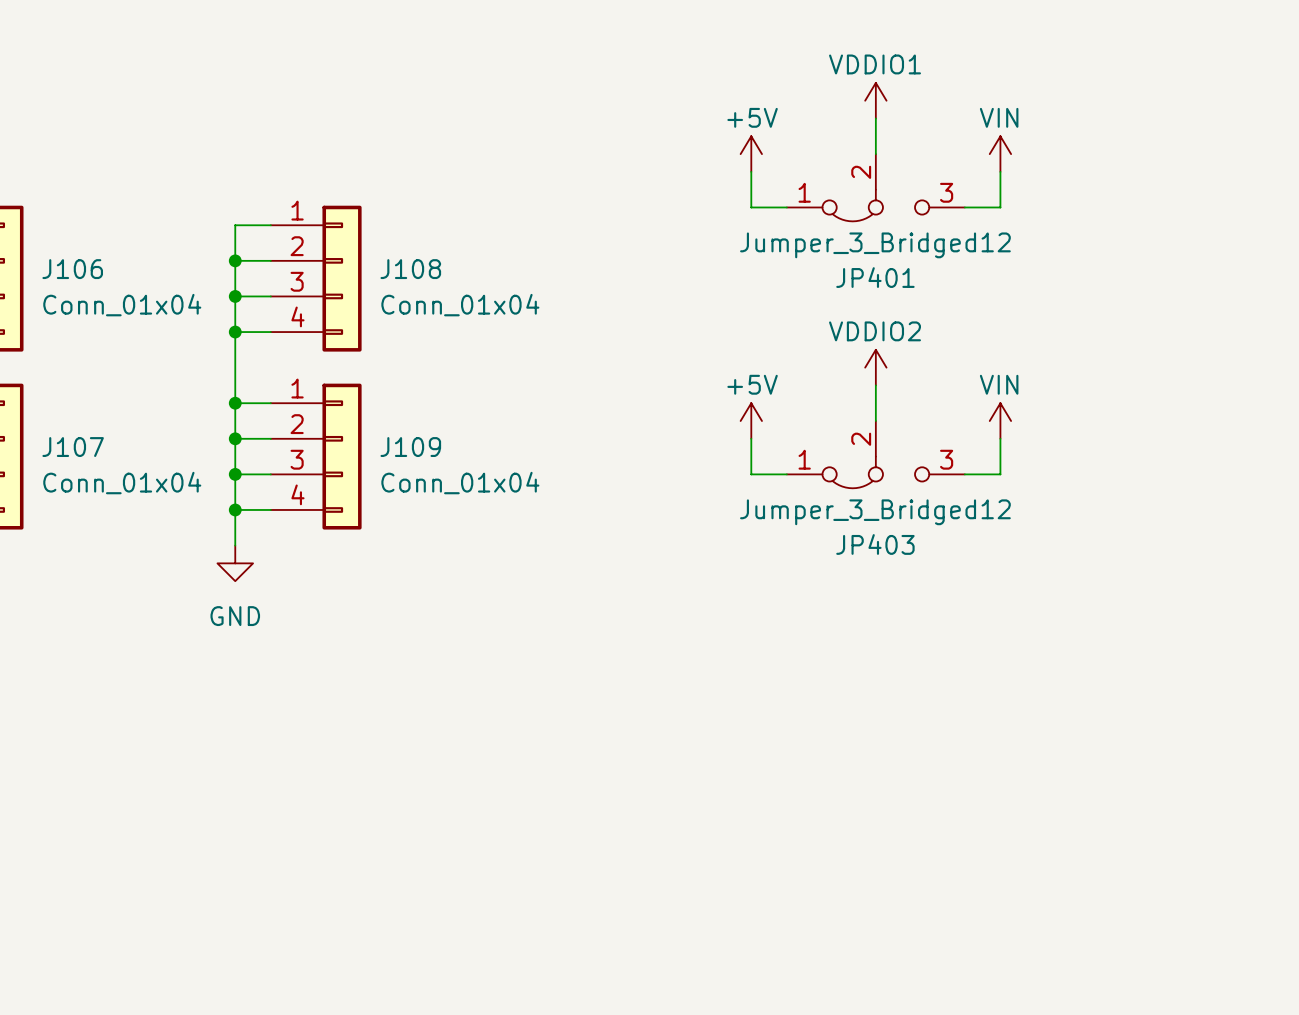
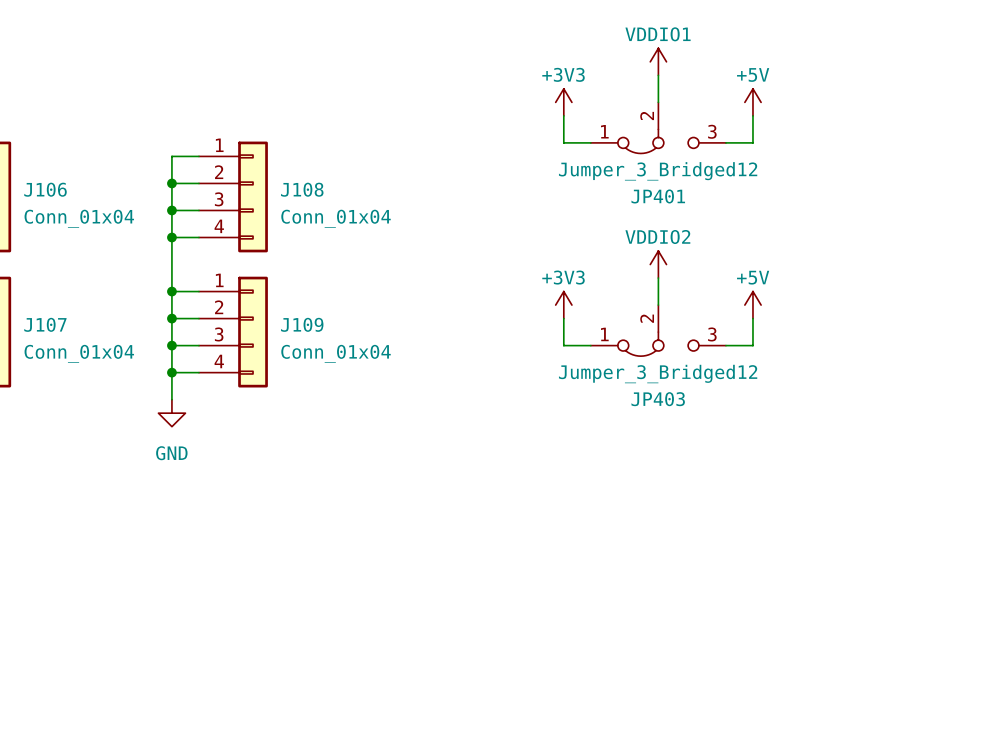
power symbol: +5V (751, 154) -> +3V3 (563, 102)
power symbol: VIN (1000, 154) -> +5V (752, 102)
power symbol: +5V (751, 421) -> +3V3 (563, 305)
power symbol: VIN (1000, 421) -> +5V (752, 305)

